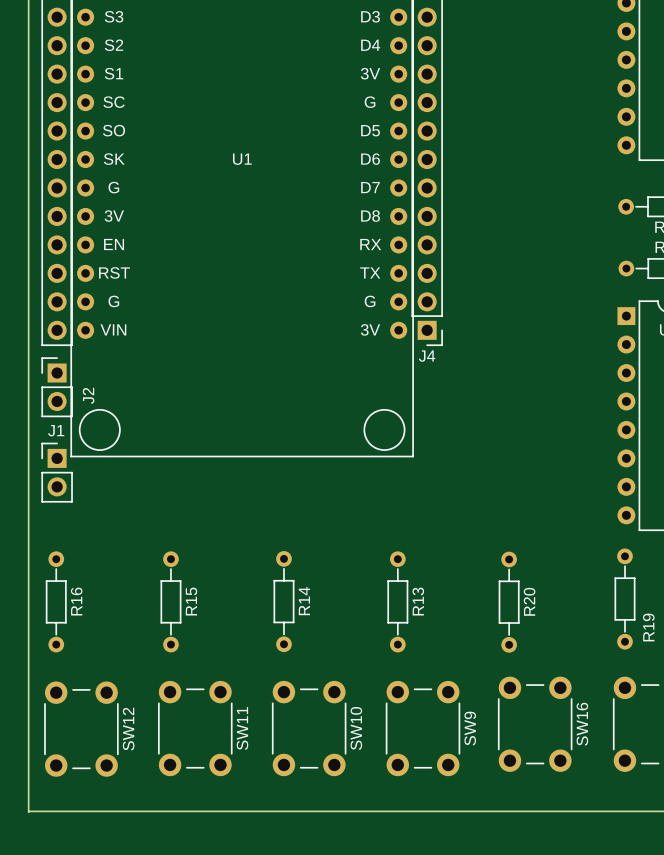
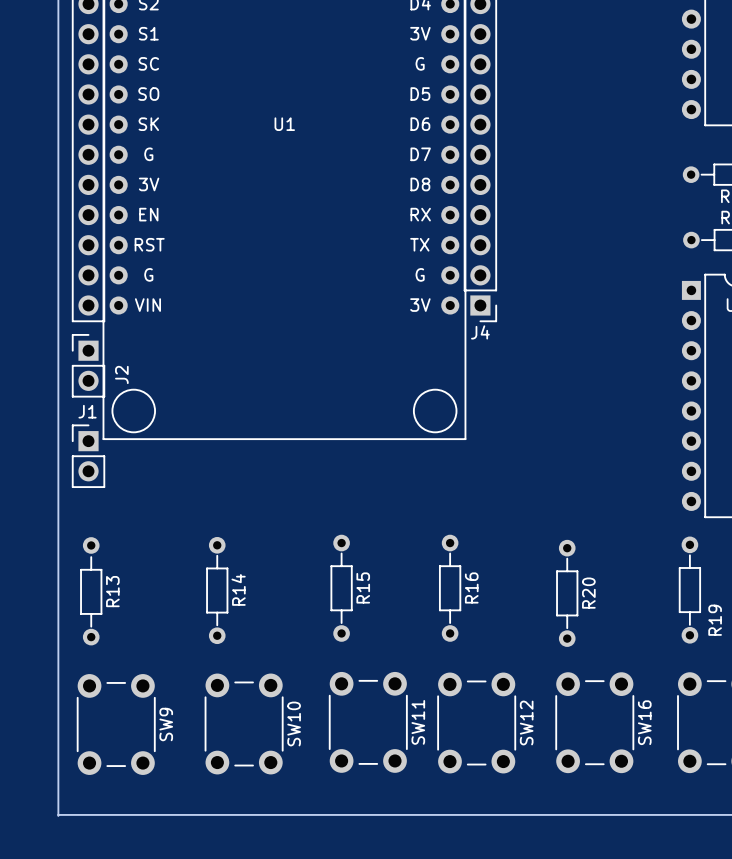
R13 footprint: [387, 551, 409, 653] -> [80, 537, 103, 646]
R16 position: (56, 601) -> (450, 588)
R15 position: (170, 601) -> (341, 588)
R14 position: (283, 601) -> (217, 590)
SW11 position: (195, 728) -> (368, 722)
SW10 position: (309, 728) -> (244, 723)
SW9 position: (423, 728) -> (116, 724)
SW12 position: (81, 729) -> (476, 722)

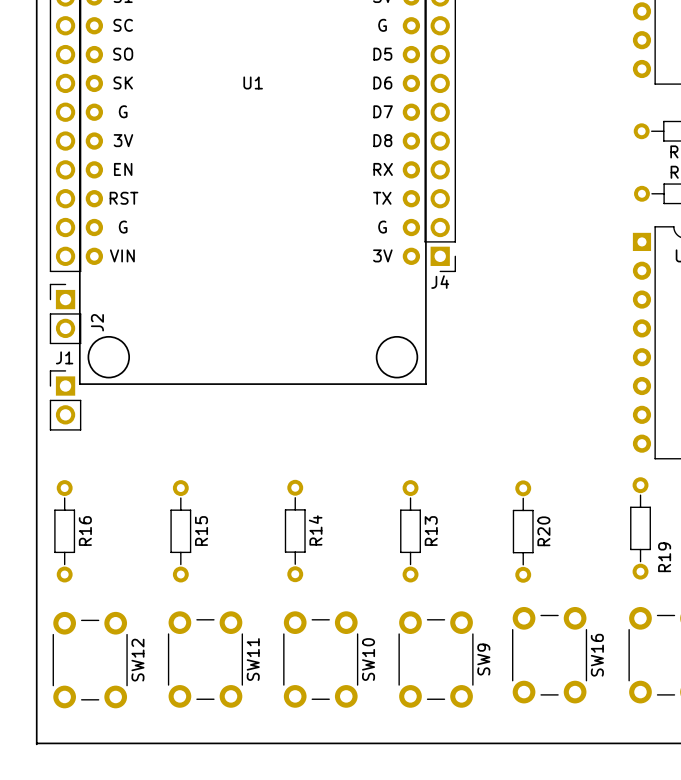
R13 footprint: [80, 537, 103, 646] -> [400, 480, 421, 583]
R15 position: (341, 588) -> (180, 531)
R16 position: (450, 588) -> (64, 531)
R14 position: (217, 590) -> (295, 531)
SW11 position: (368, 722) -> (205, 659)
SW12 position: (476, 722) -> (90, 660)
SW10 position: (244, 723) -> (320, 659)
SW9 position: (116, 724) -> (436, 659)

